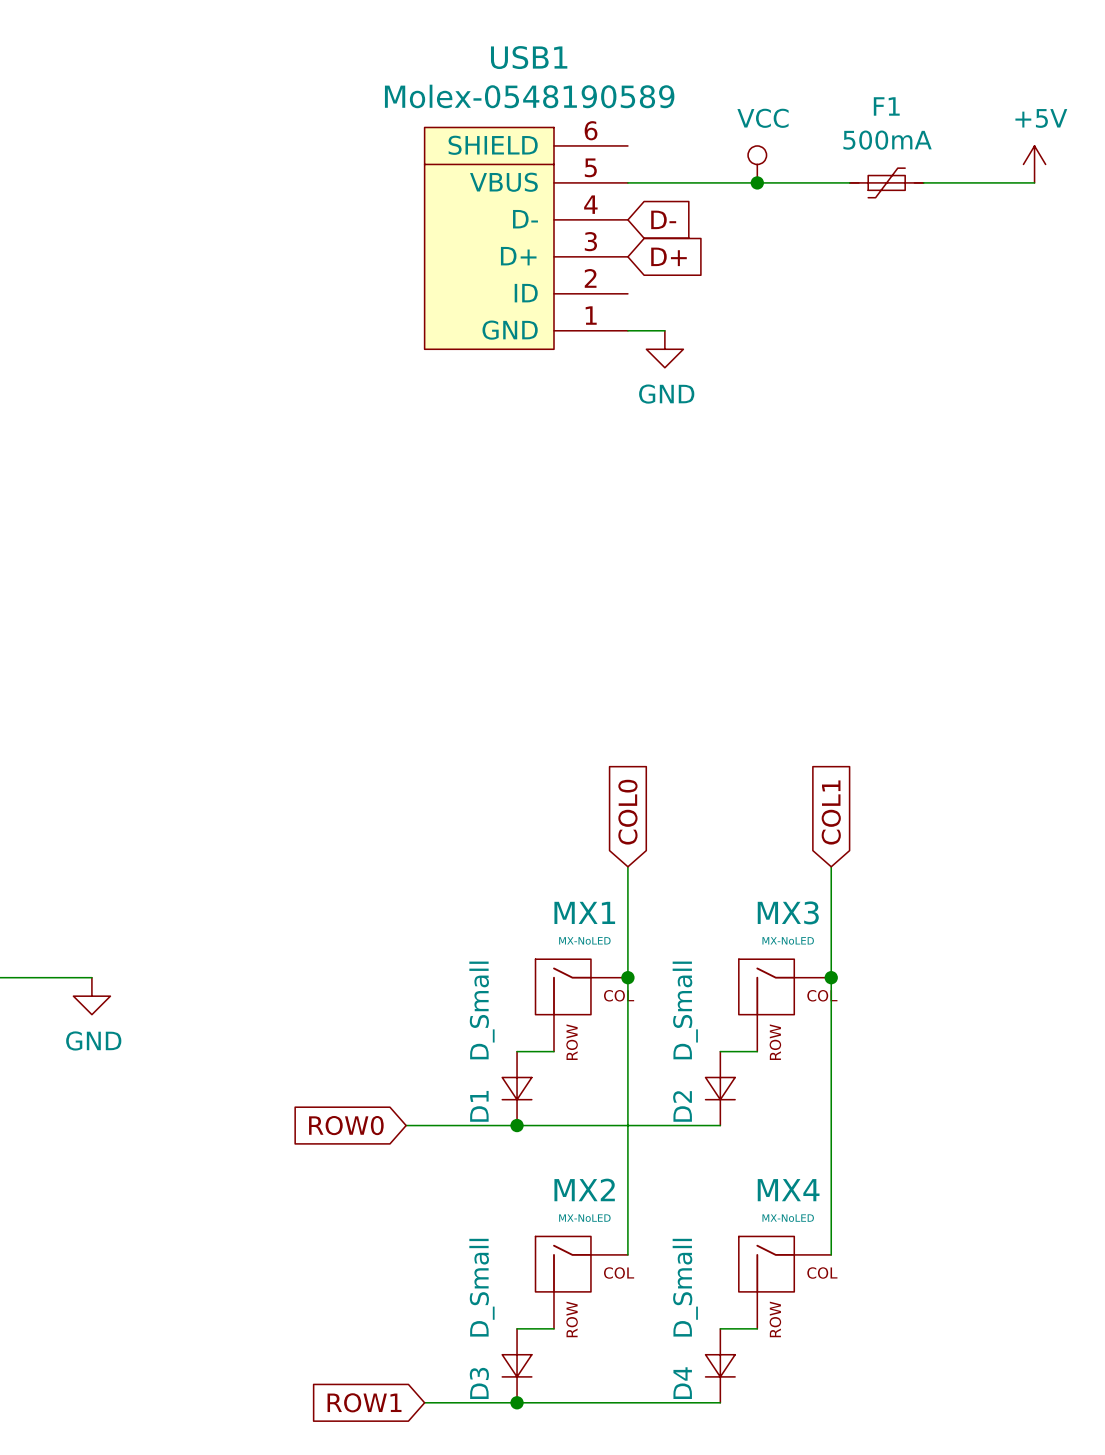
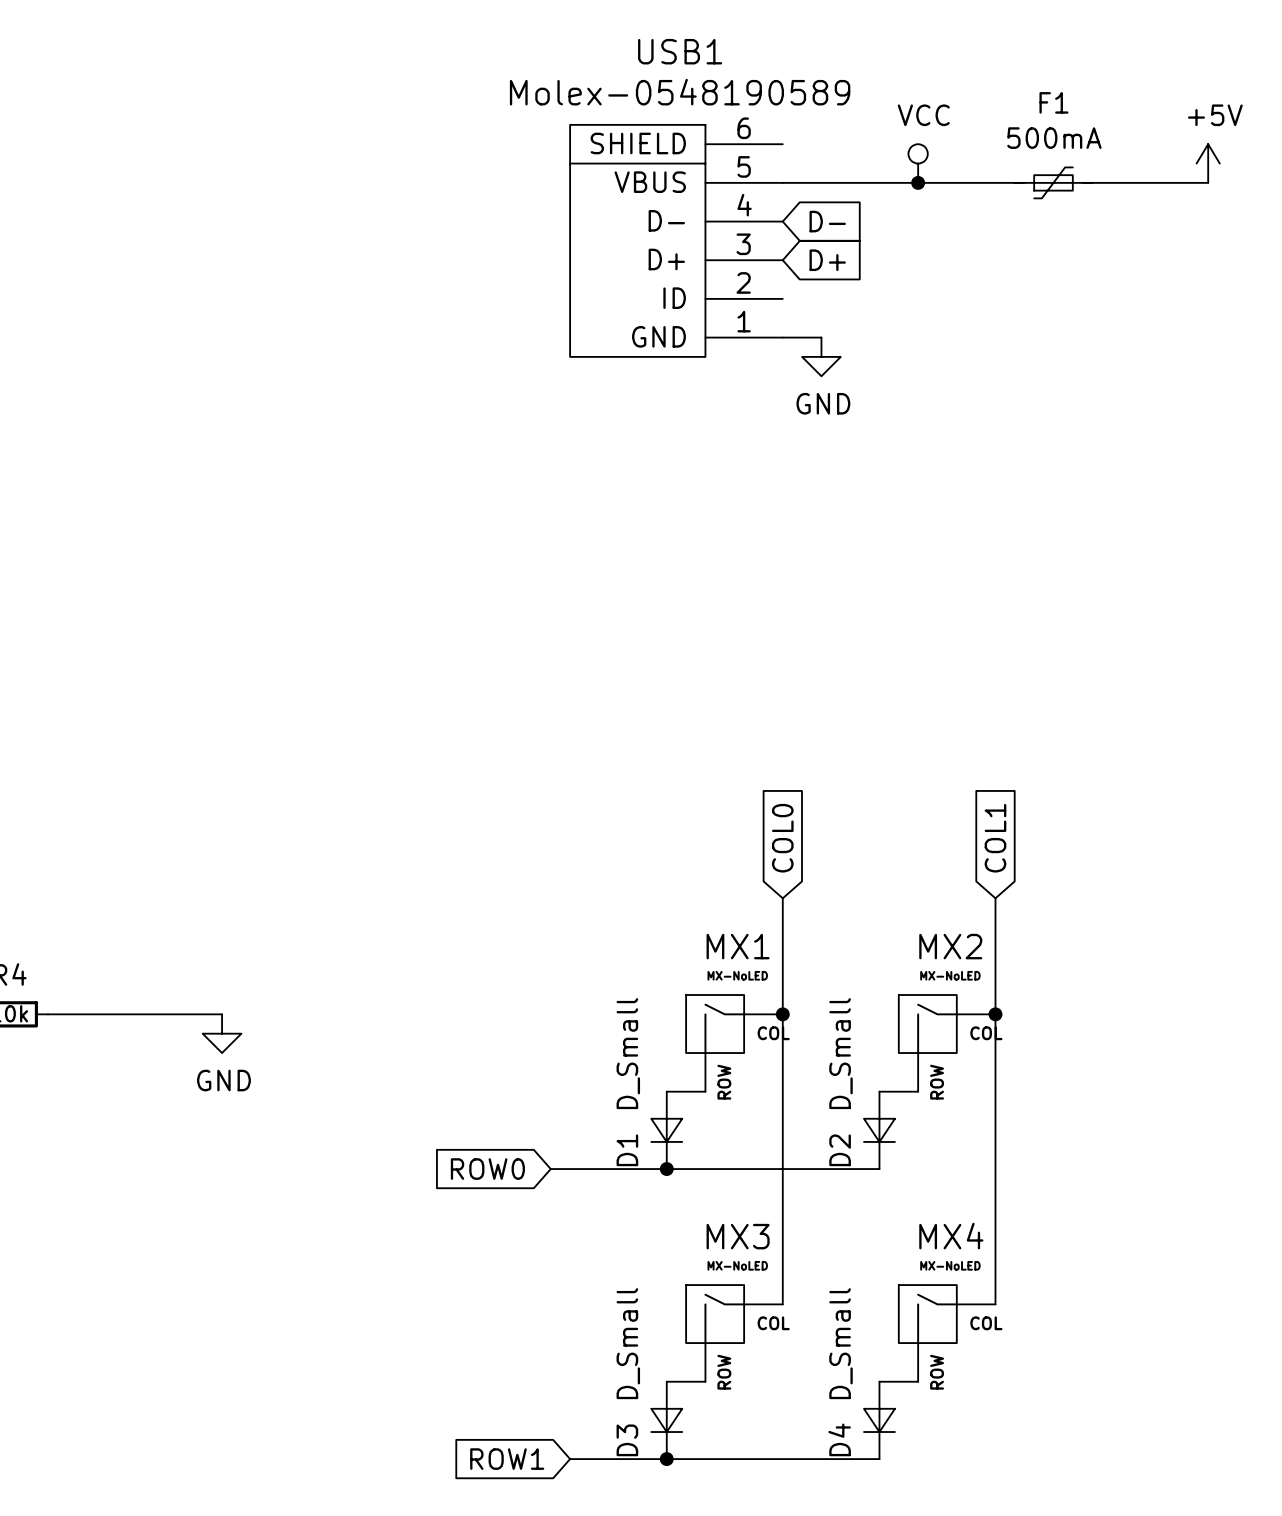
MX3 name: MX3 (788, 912) -> MX2 (950, 946)
MX2 name: MX2 (584, 1189) -> MX3 (738, 1236)

